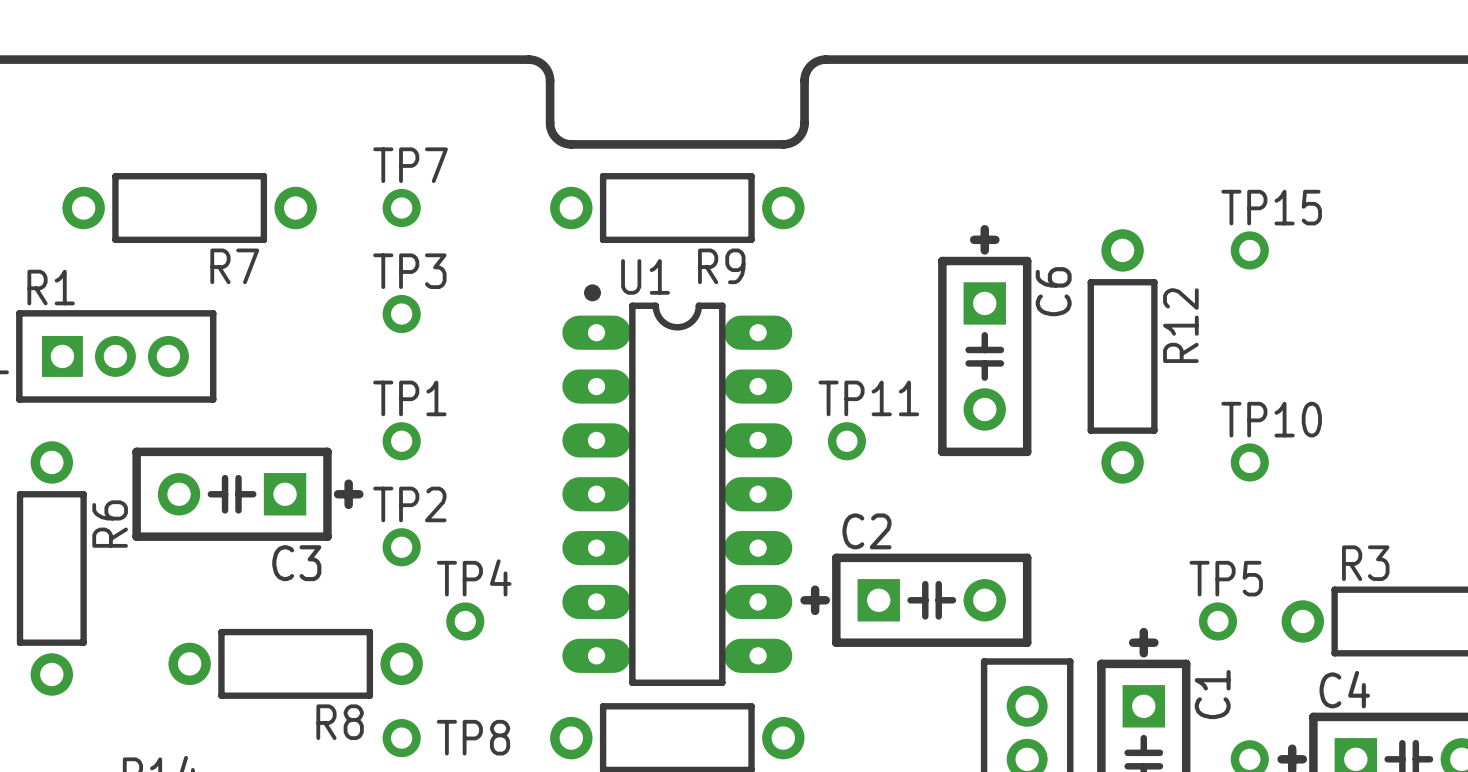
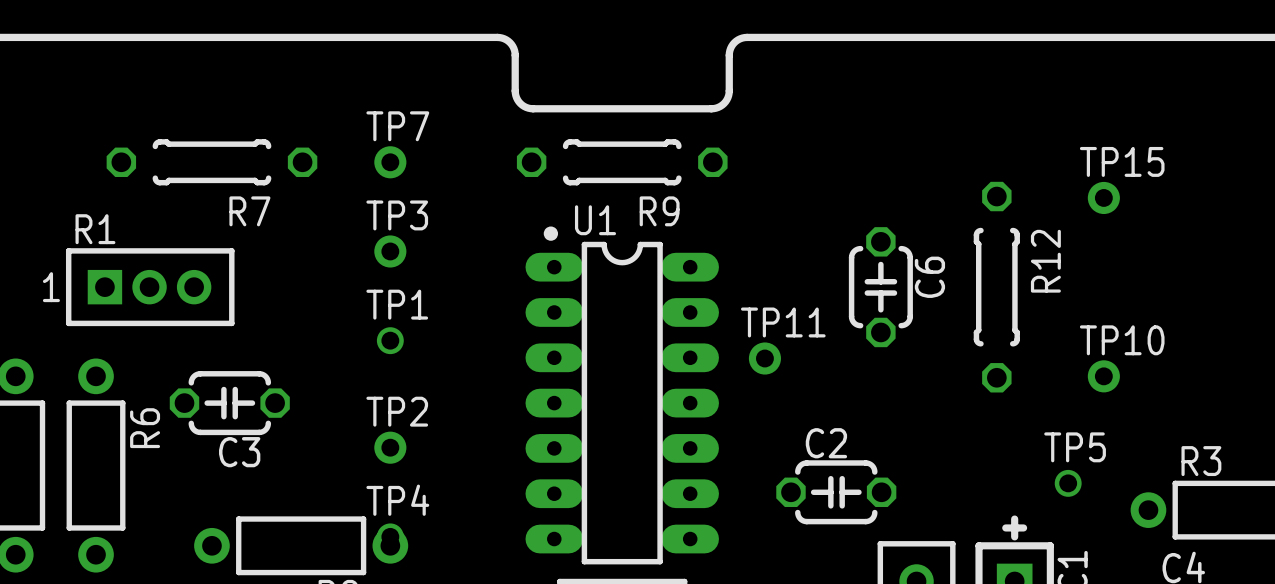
R7 footprint: [62, 173, 317, 244] -> [106, 139, 318, 186]
R9 footprint: [550, 173, 805, 244] -> [516, 139, 728, 186]
C6 footprint: [938, 224, 1032, 457] -> [848, 227, 913, 348]
R12 footprint: [1087, 229, 1158, 484] -> [973, 181, 1020, 393]
TP1 footprint: [382, 422, 421, 461] -> [376, 327, 404, 355]
C3 footprint: [132, 447, 364, 541] -> [169, 371, 290, 436]
C2 footprint: [800, 553, 1032, 647] -> [776, 460, 897, 525]
TP4 footprint: [446, 602, 485, 641] -> [376, 523, 404, 551]
TP5 footprint: [1198, 602, 1238, 641] -> [1054, 469, 1082, 497]

